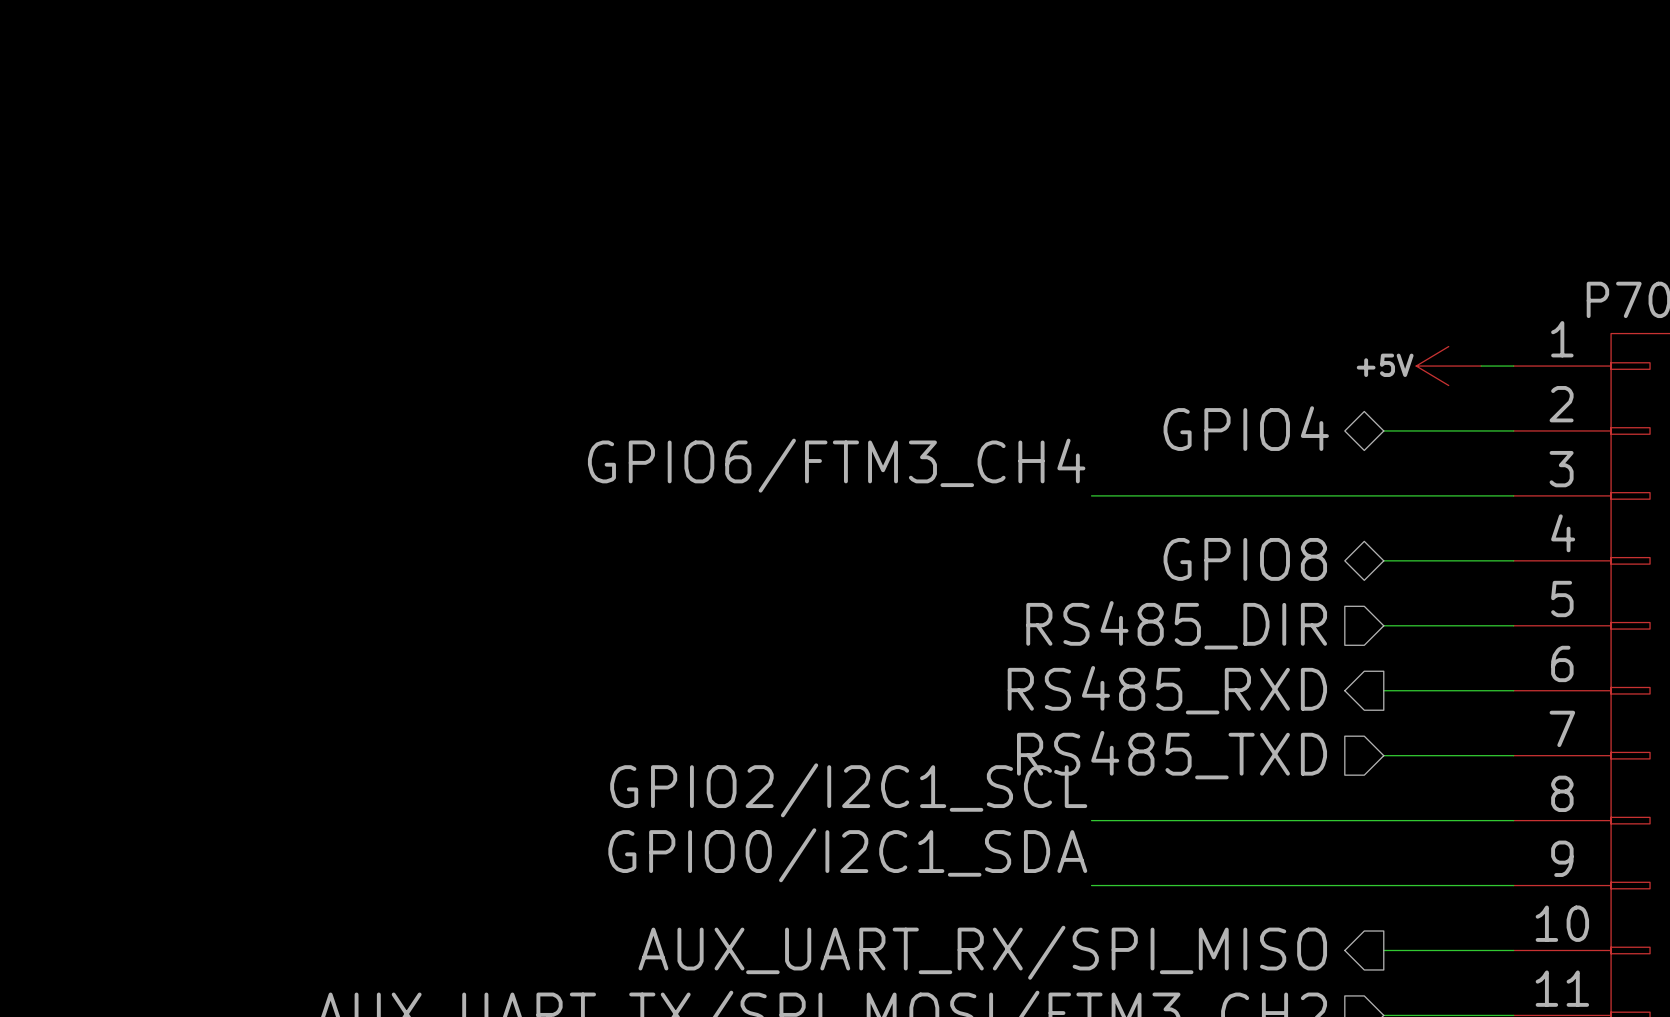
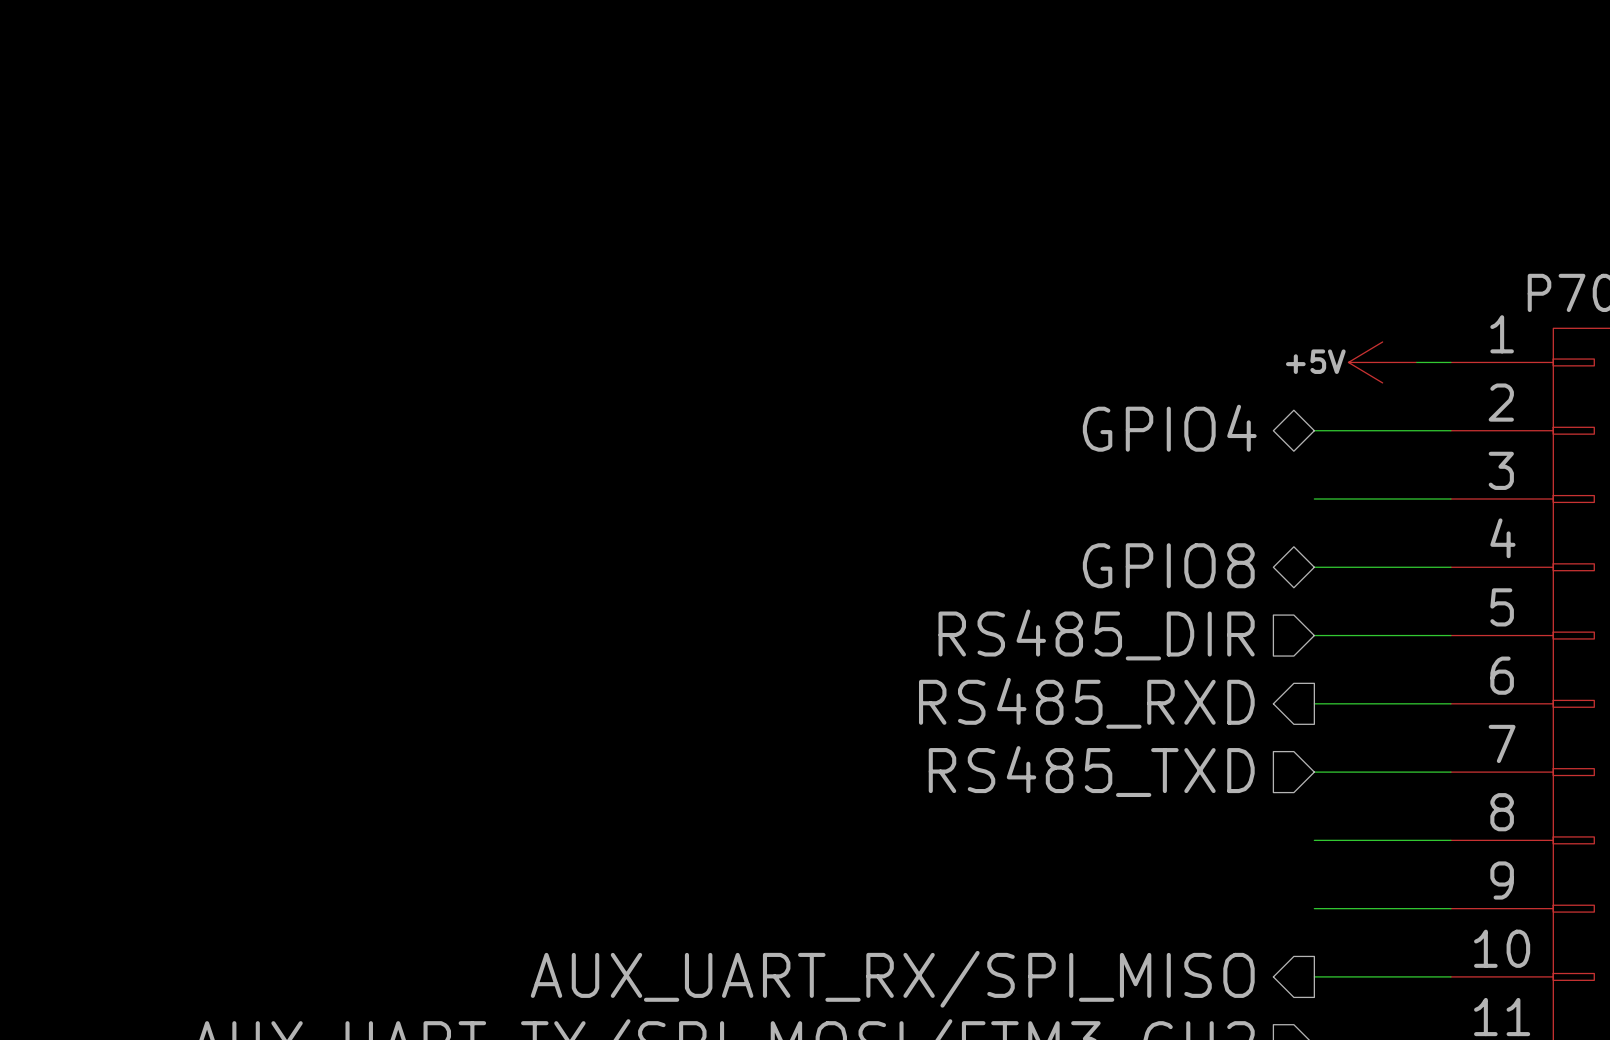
label: GPIO6/FTM3_CH4 (836, 465) -> none
wire: (1091, 495) (1383, 495) -> none
label: GPIO2/I2C1_SCL (848, 790) -> none
wire: (1091, 820) (1383, 820) -> none
label: GPIO0/I2C1_SDA (847, 855) -> none
wire: (1091, 885) (1383, 885) -> none

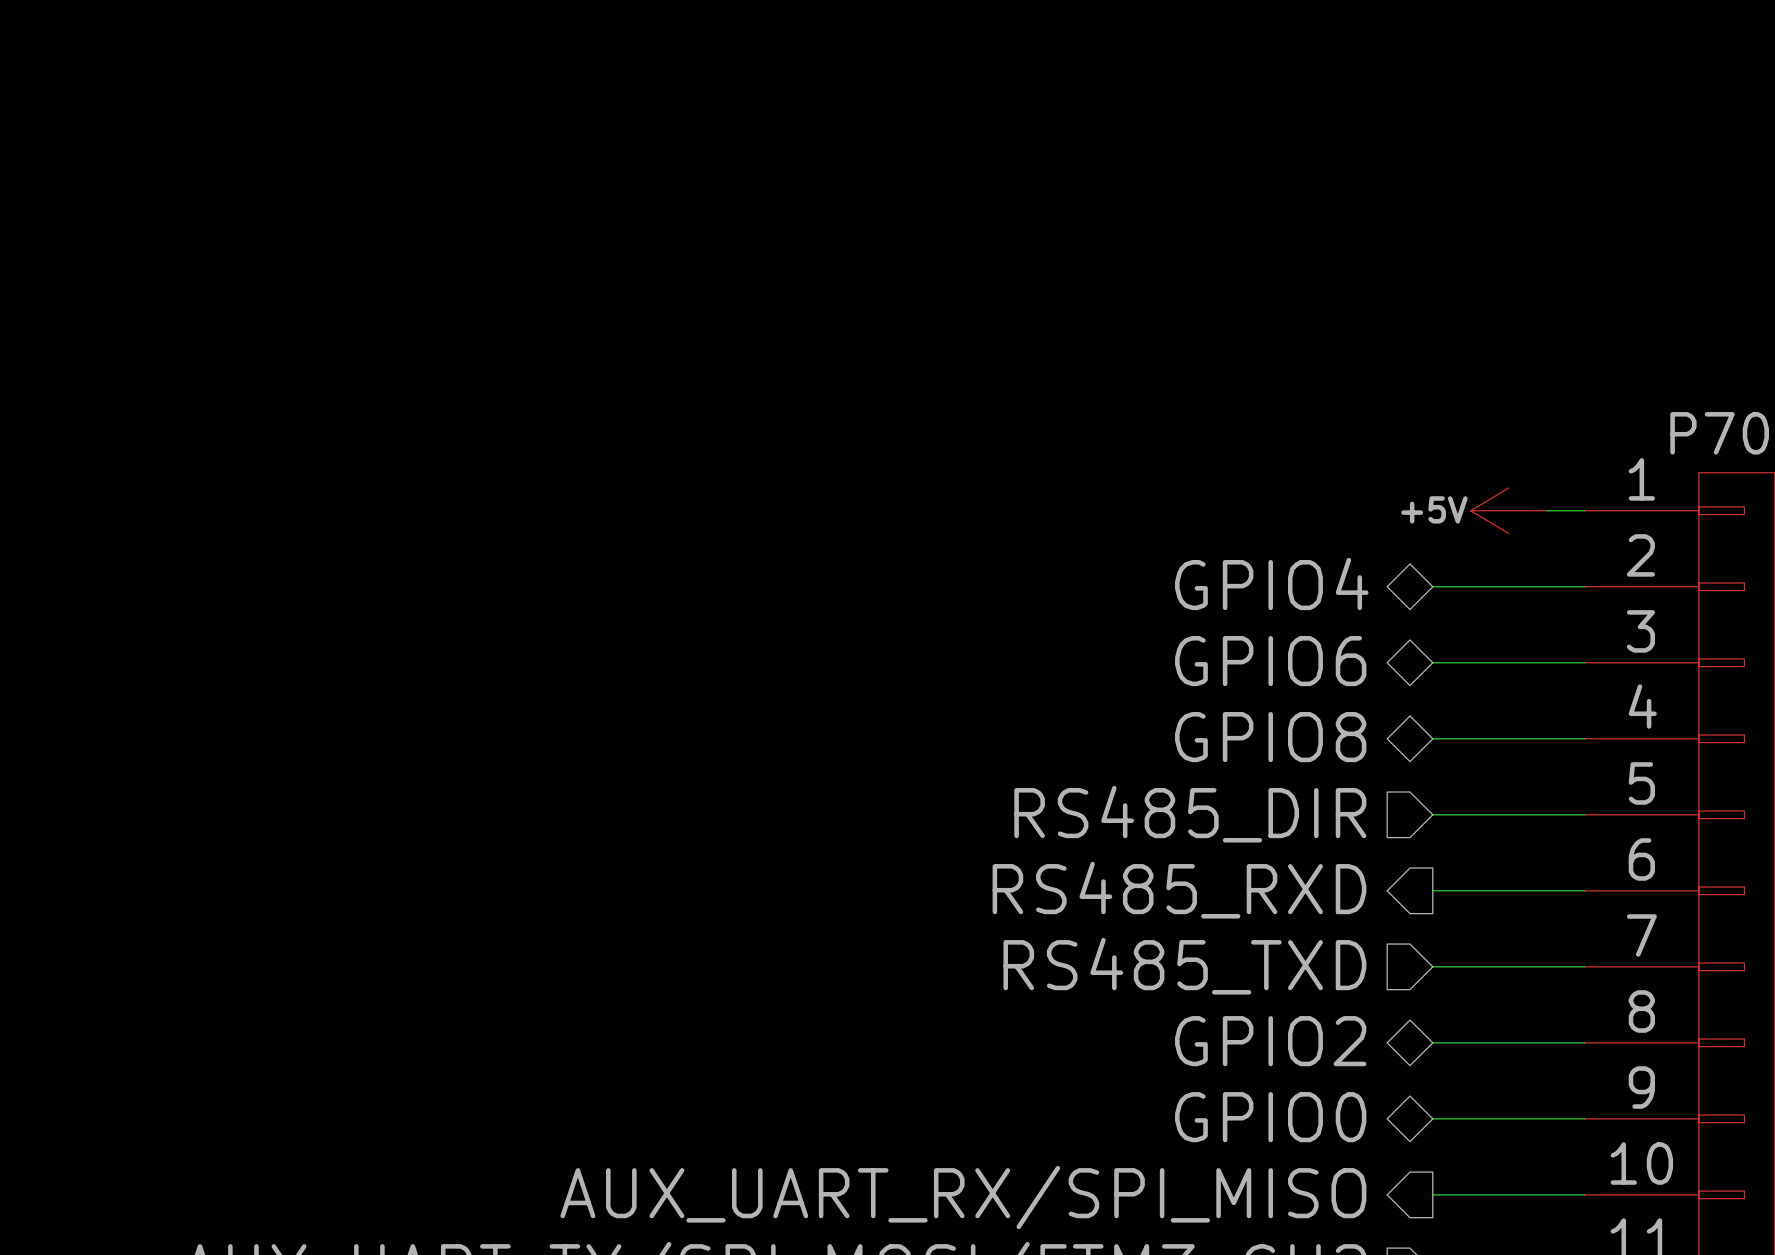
hierarchical label: none -> GPIO6 (1270, 661)
hierarchical label: none -> GPIO2 (1270, 1041)
hierarchical label: none -> GPIO0 (1270, 1117)

